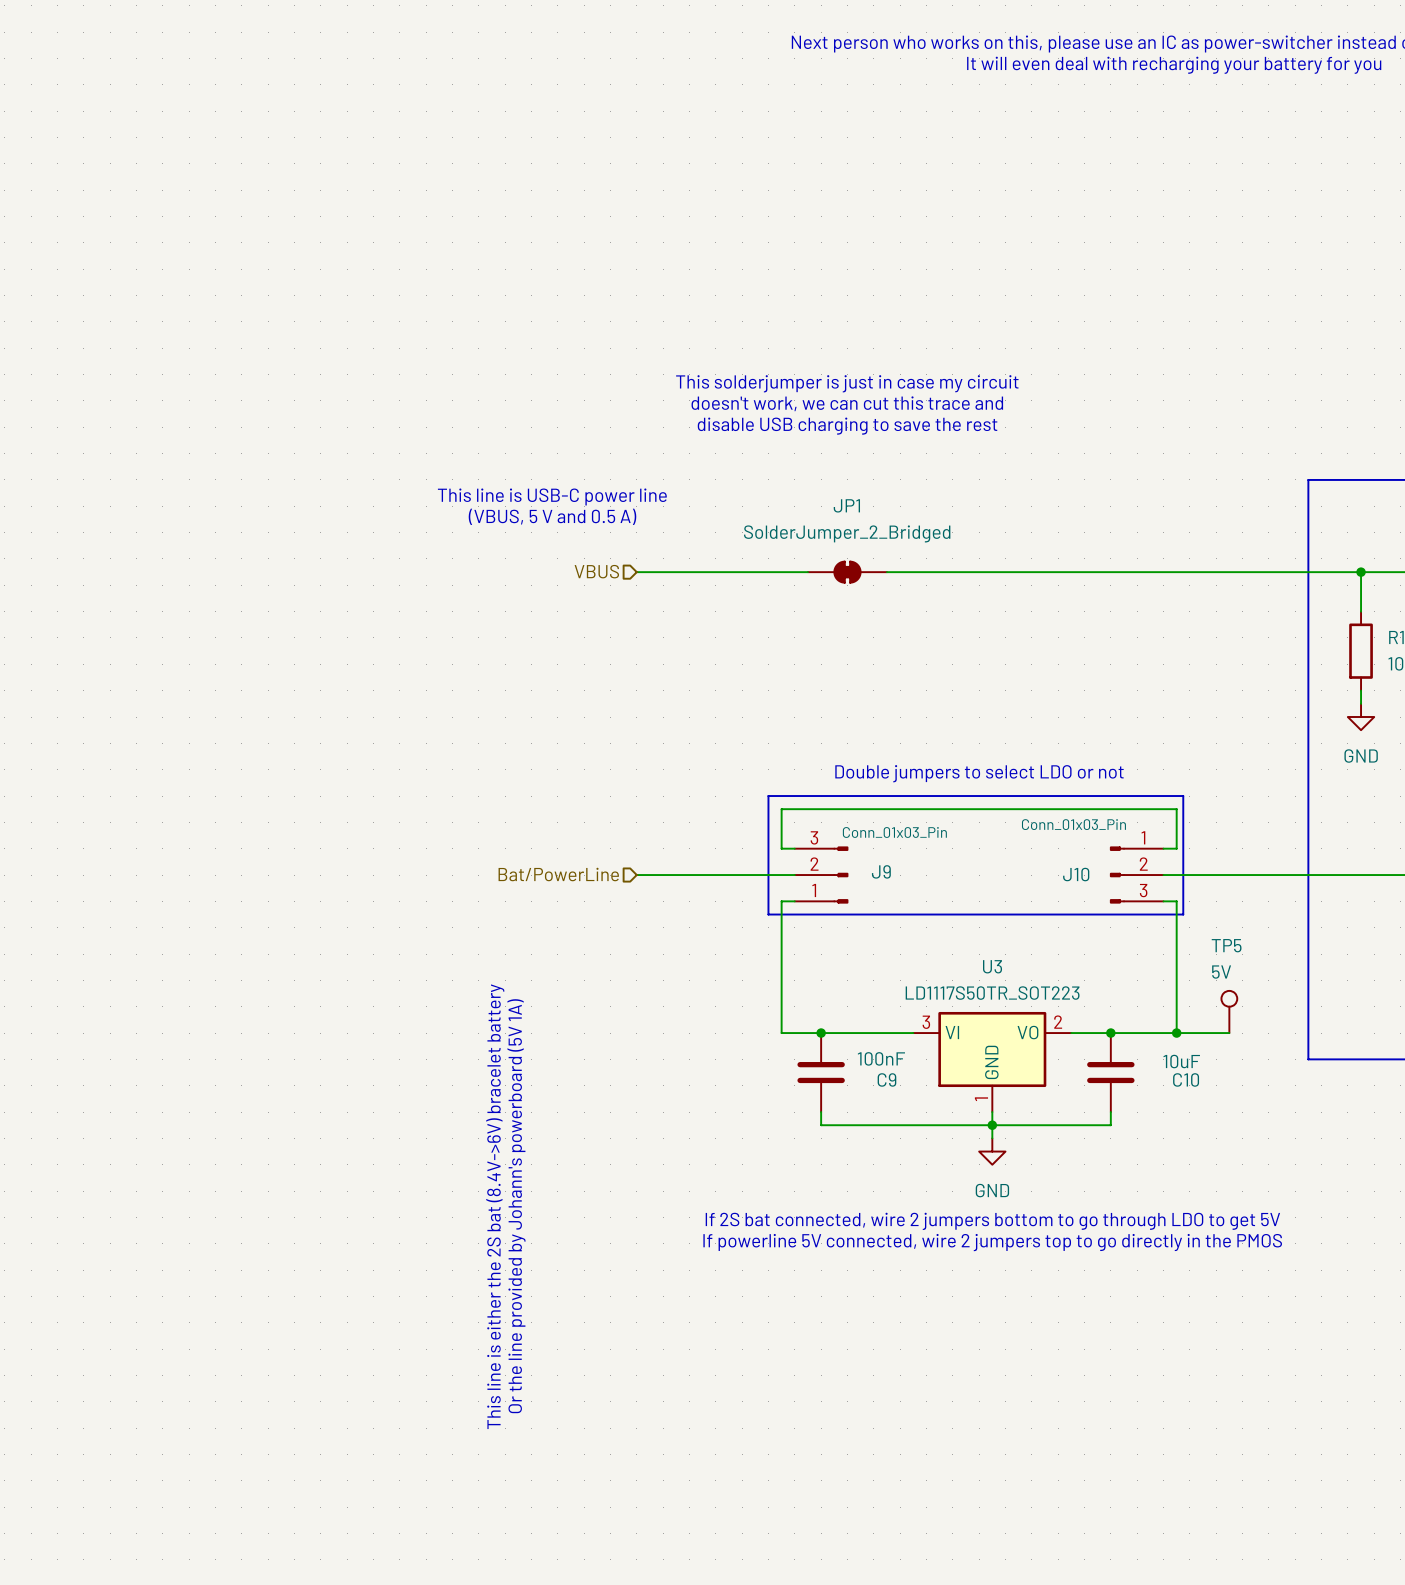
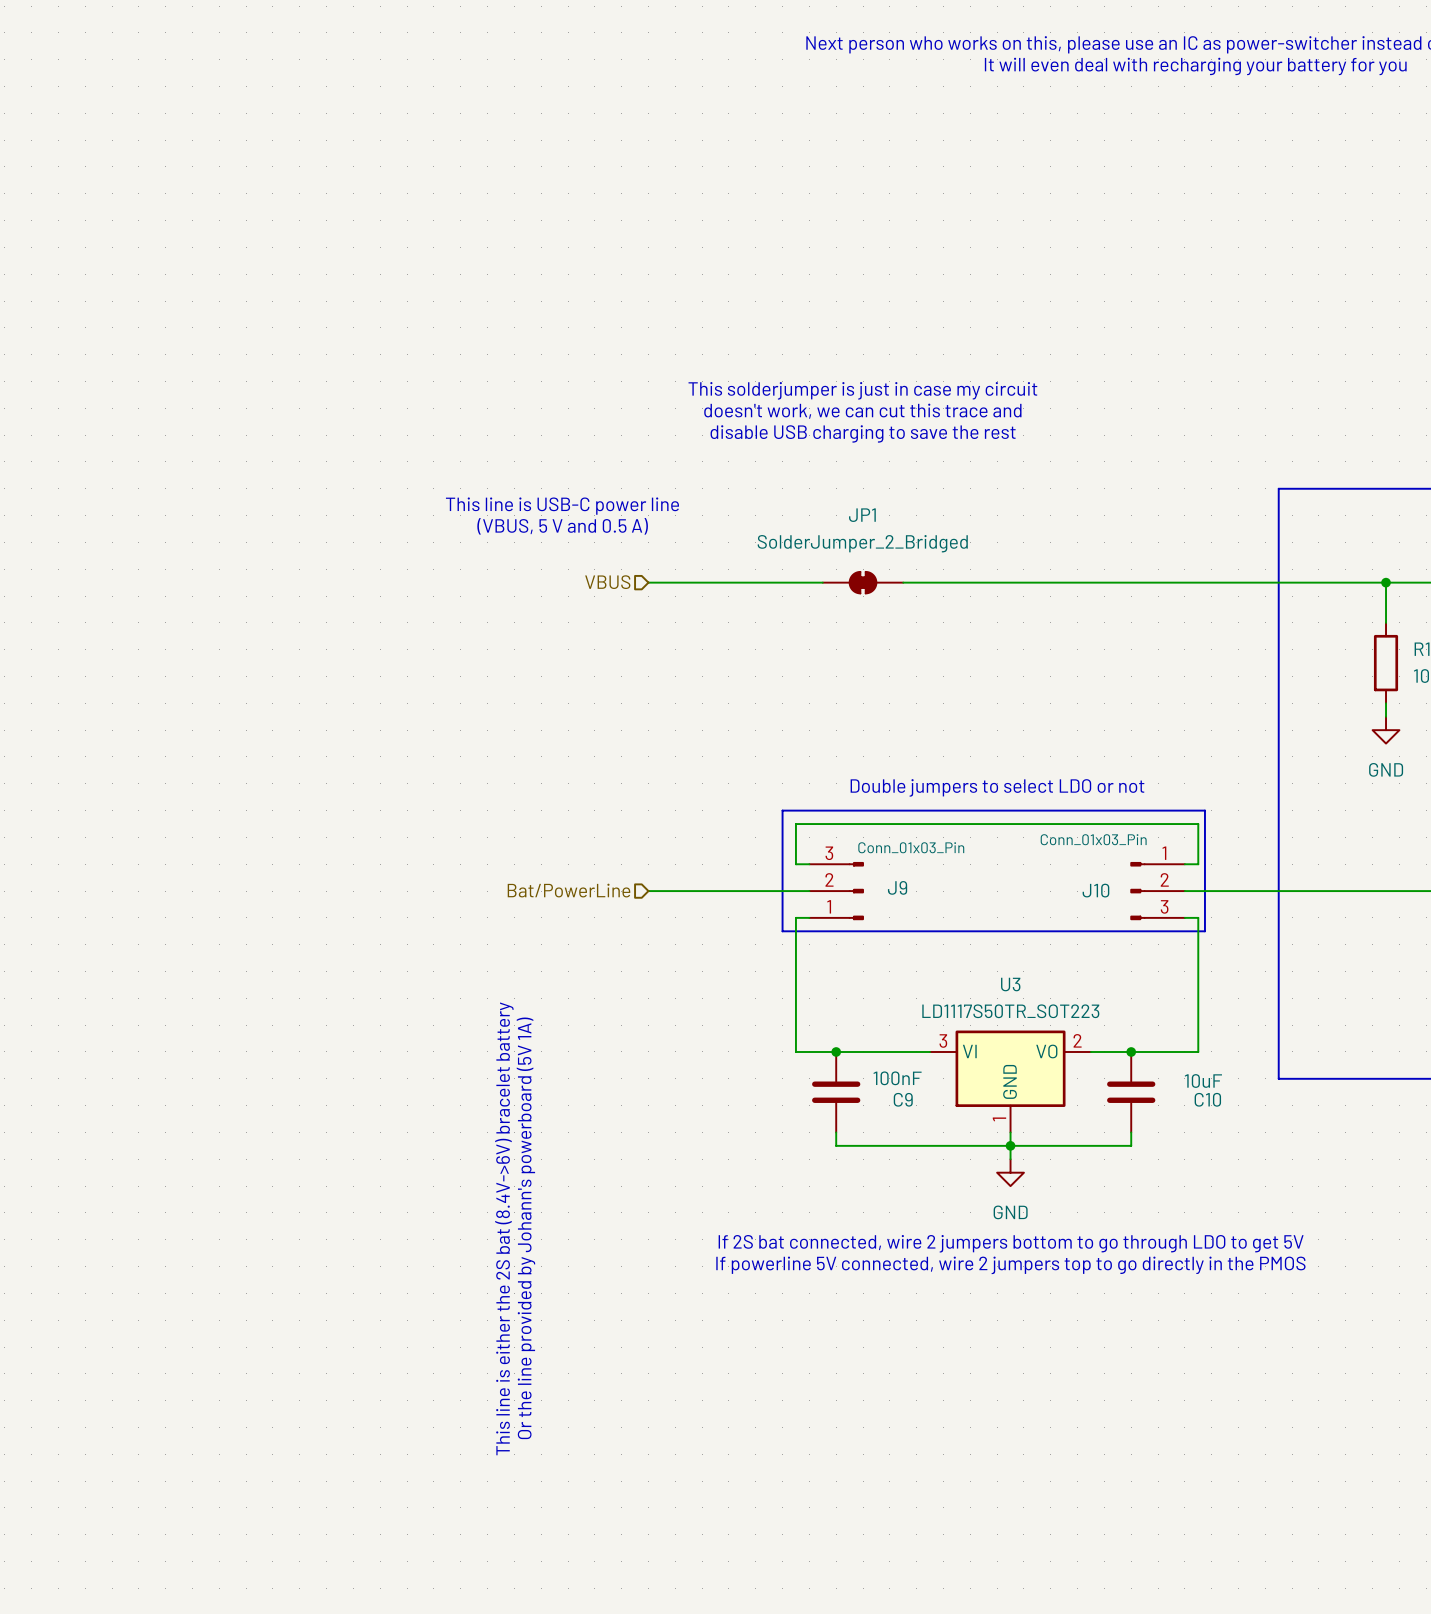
line: (1308, 479) (1308, 1059) -> (1332, 488) (1278, 488) (1278, 1078) (1332, 1078)
TP5: 5V (1229, 1011) -> none
wire: (1176, 1033) (1229, 1033) -> none
junction: (1176, 1033) -> none

